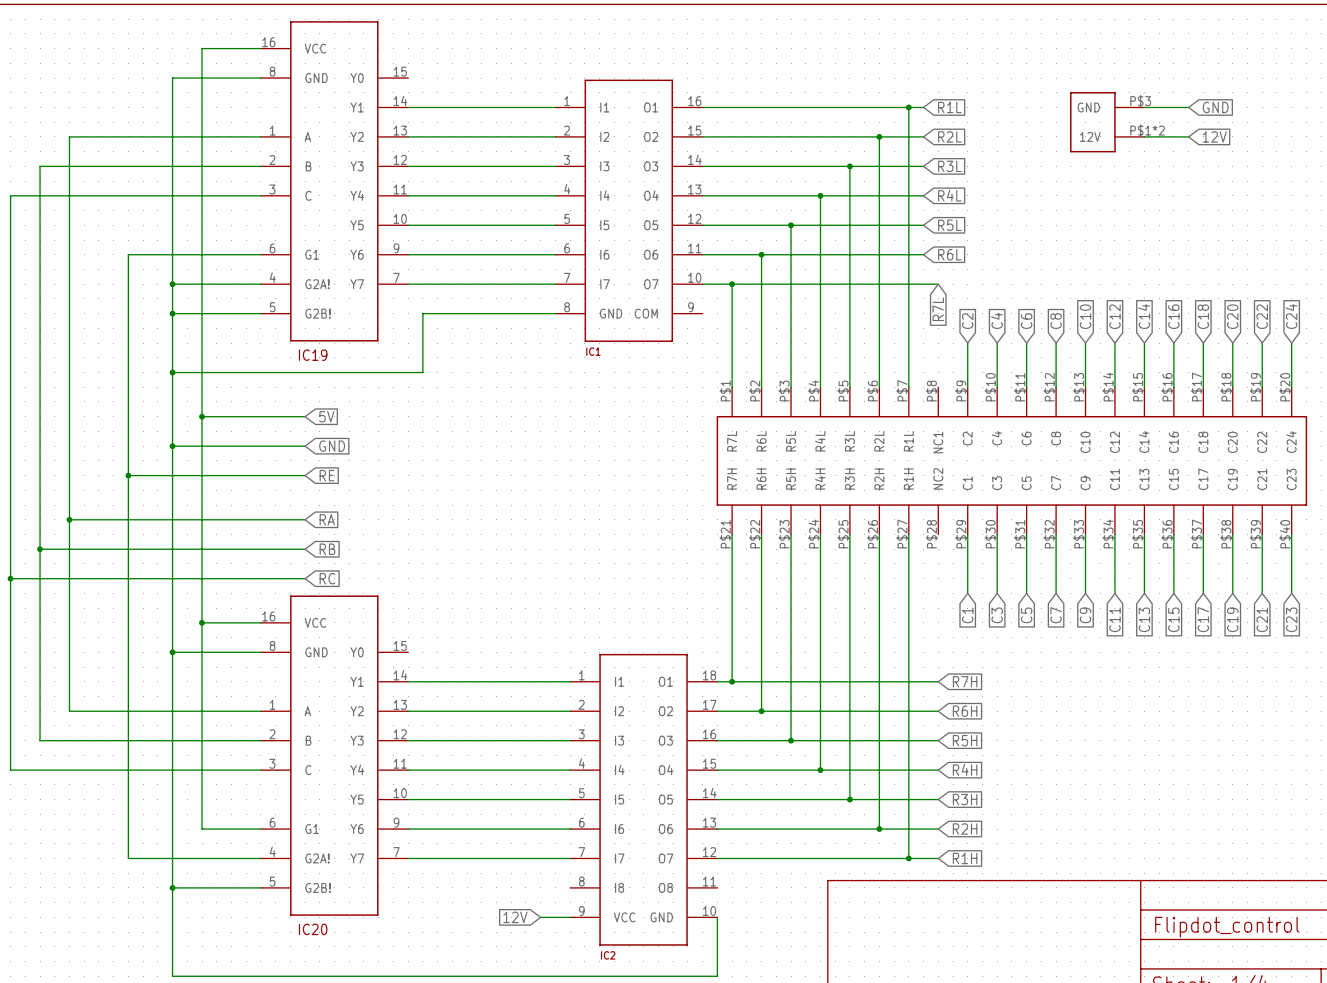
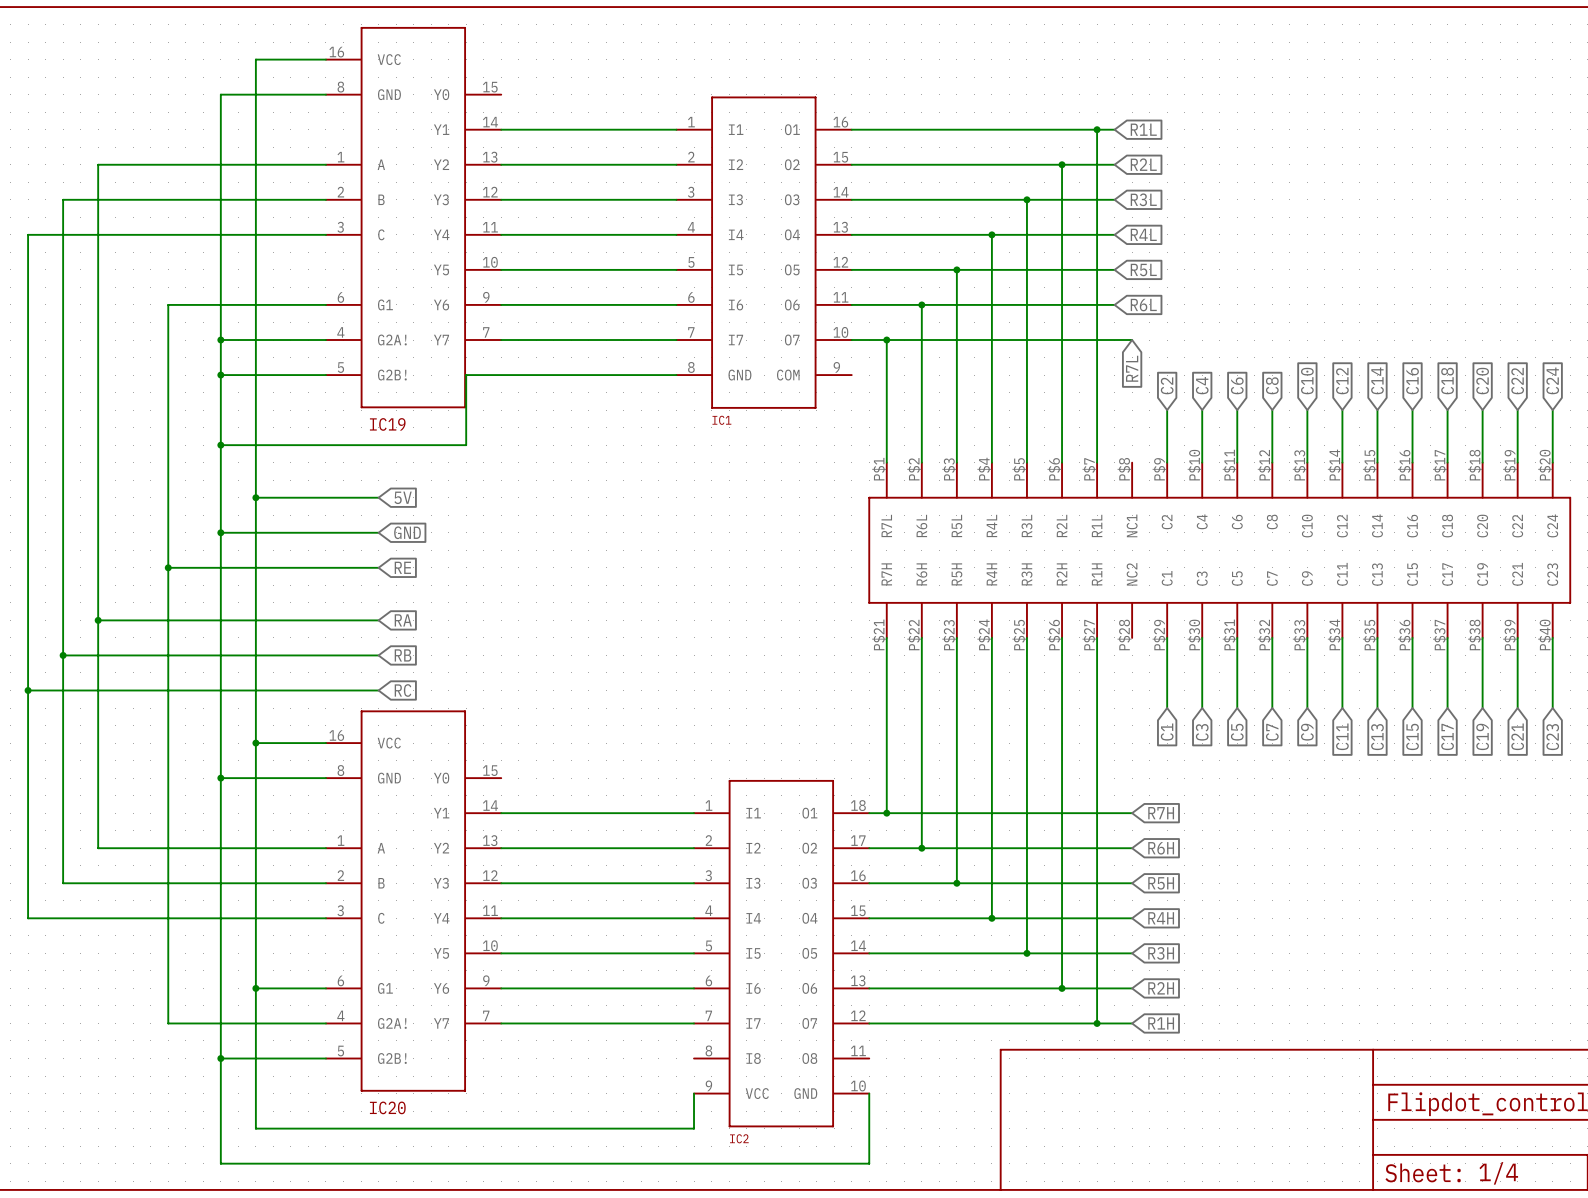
wire: (1144, 107) (1188, 107) -> none
global label: GND (1215, 107) -> none
part: (1107, 122) -> none
wire: (1144, 136) (1188, 136) -> none
global label: 12V (1214, 136) -> none
wire: (422, 313) (422, 372) (378, 372) -> (518, 375) (466, 375) (466, 445)
junction: none -> (255, 988)
global label: 12V (515, 917) -> none
wire: (540, 917) (570, 917) -> (255, 988) (255, 1128) (694, 1128) (694, 1093)

